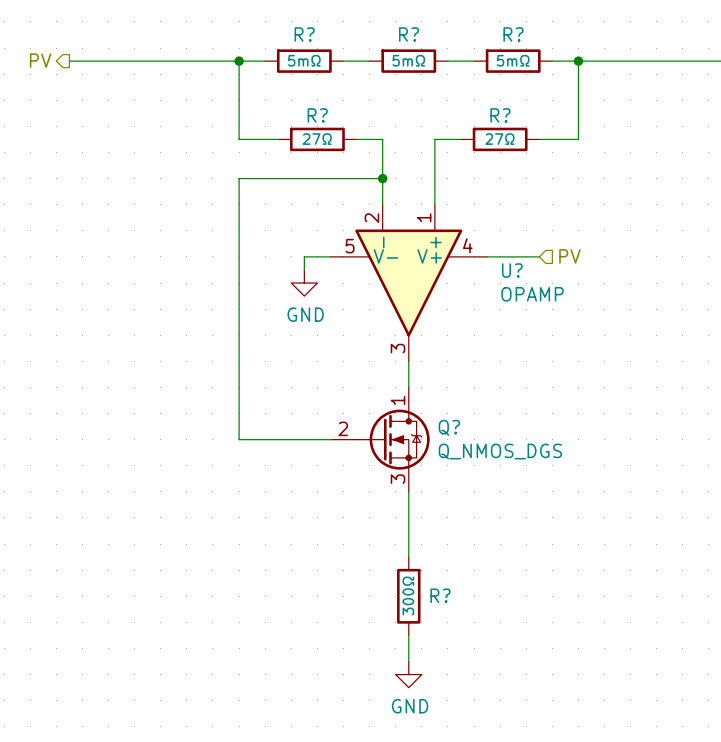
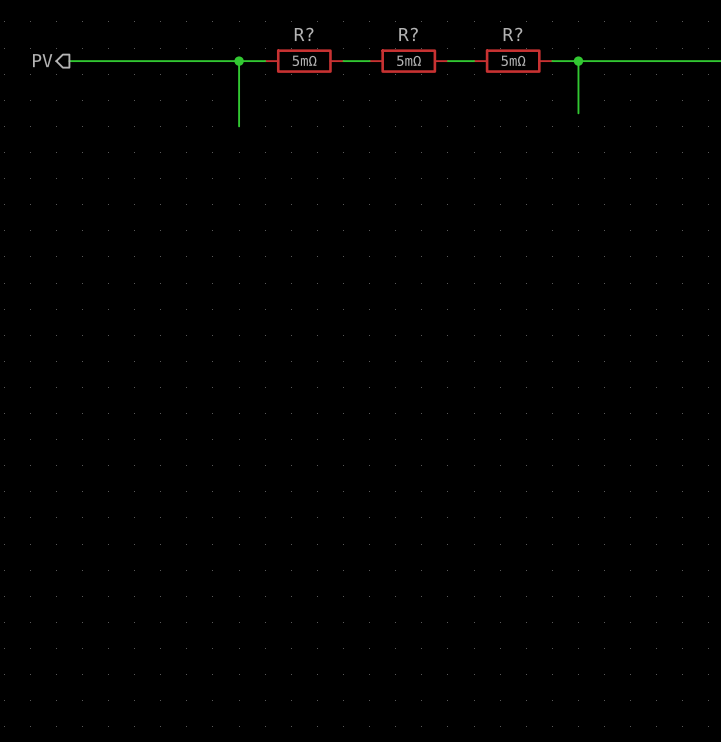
wire: (578, 113) (578, 139) (539, 139) -> none
wire: (239, 126) (239, 139) (278, 139) -> none
R?: 27Ω (317, 139) -> none
wire: (356, 139) (382, 139) (382, 204) -> none
wire: (460, 139) (434, 139) (434, 204) -> none
R?: 27Ω (500, 139) -> none
wire: (382, 178) (239, 178) (239, 439) (330, 439) -> none
junction: (382, 178) -> none
wire: (330, 256) (304, 256) (304, 269) -> none
wire: (487, 256) (539, 256) -> none
hierarchical label: PV (569, 256) -> none
power symbol: GND (304, 283) -> none
U?: OPAMP (408, 283) -> none
wire: (408, 361) (408, 387) -> none
Q?: Q_NMOS_DGS (380, 439) -> none
wire: (408, 491) (408, 557) -> none
R?: 300Ω (408, 596) -> none
wire: (408, 635) (408, 661) -> none
power symbol: GND (408, 674) -> none

